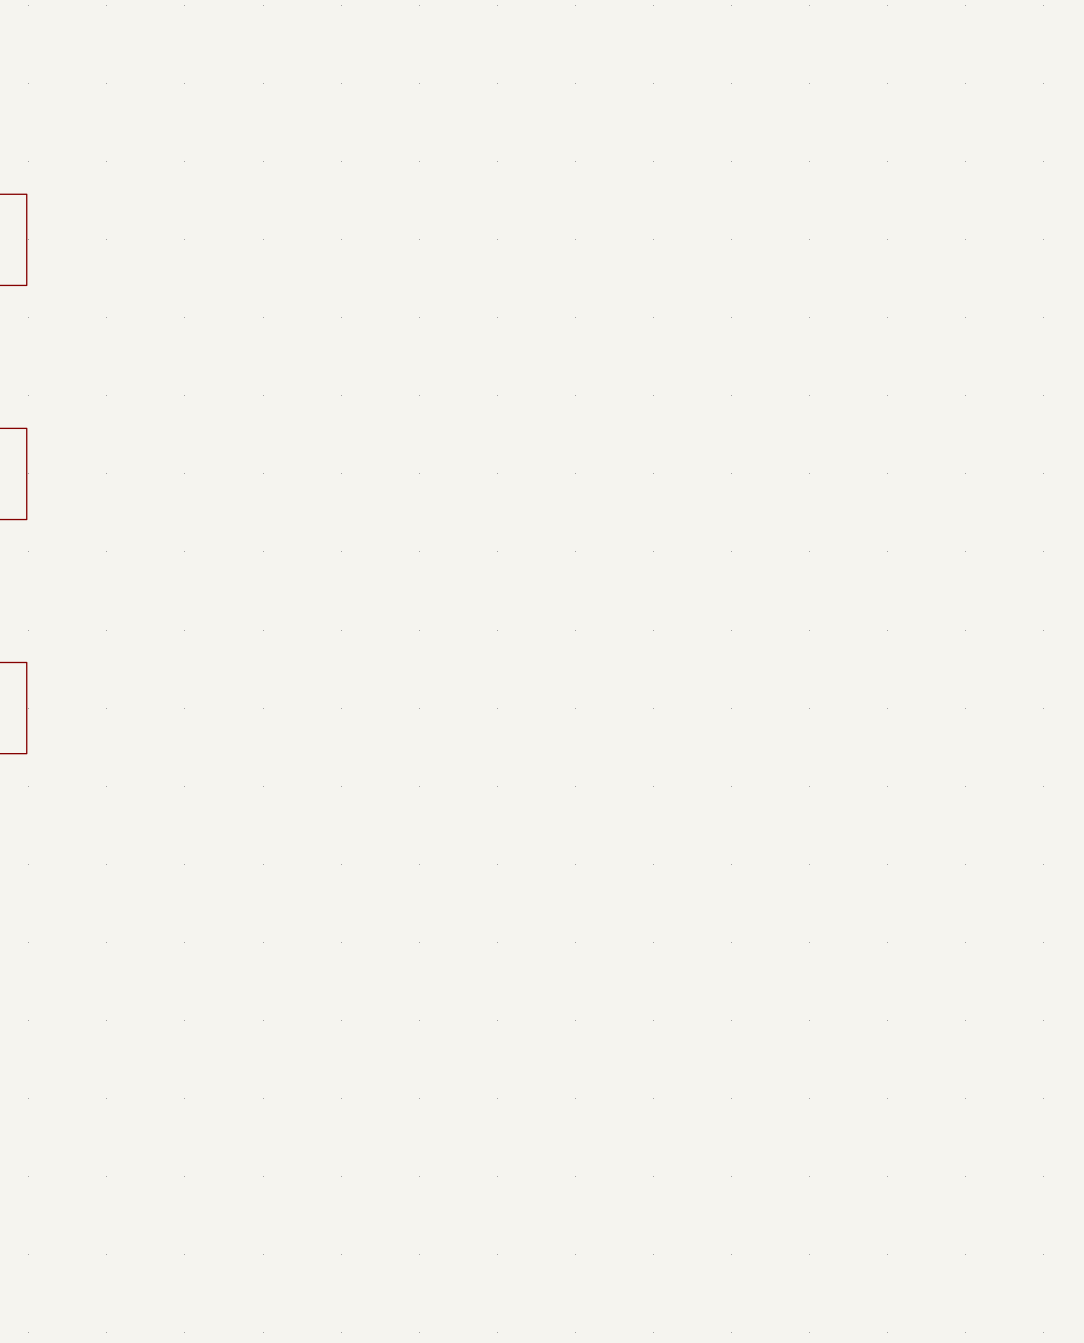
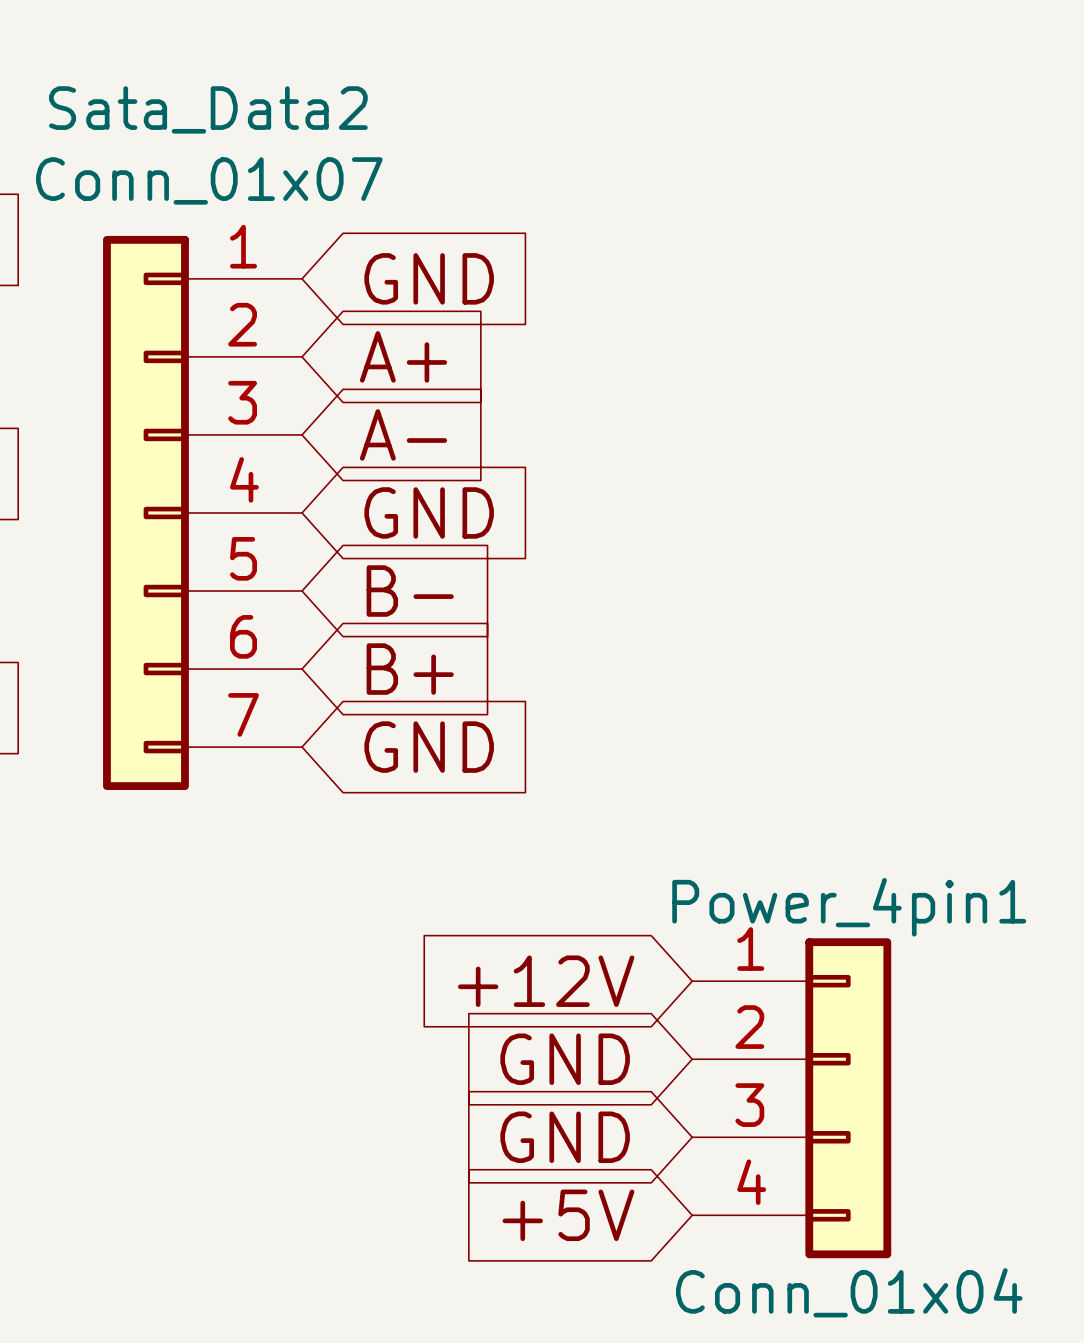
global label: none -> GND (429, 278)
global label: none -> A+ (403, 356)
global label: none -> A- (403, 434)
Sata_Data2: none -> Conn_01x07 (202, 512)
global label: none -> GND (429, 512)
global label: none -> B- (410, 591)
global label: none -> B+ (410, 669)
global label: none -> GND (429, 747)
global label: none -> +12V (546, 981)
global label: none -> GND (565, 1059)
Power_4pin1: none -> Conn_01x04 (791, 1098)
global label: none -> GND (565, 1137)
global label: none -> +5V (568, 1215)

